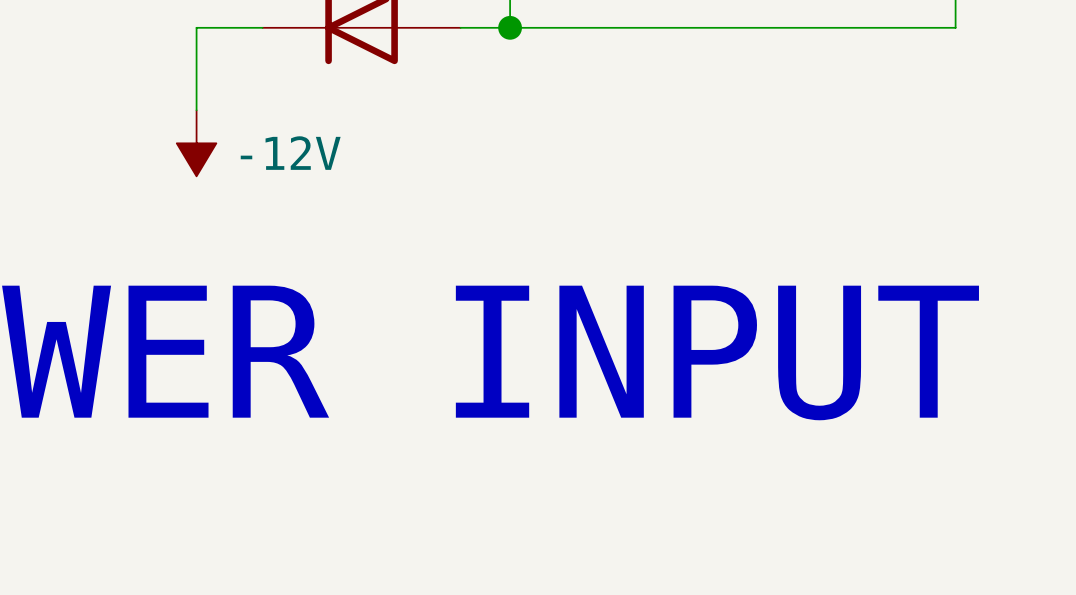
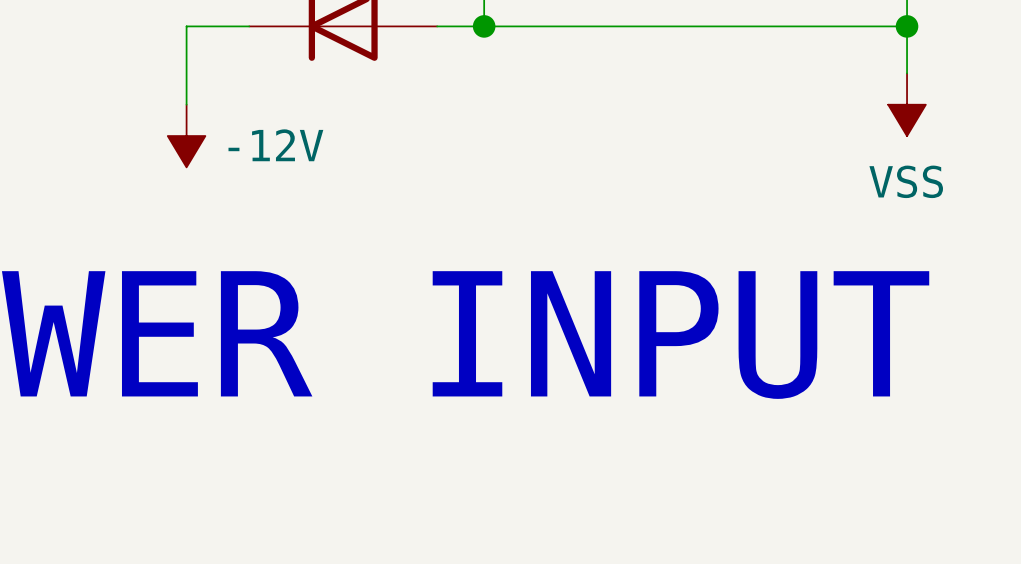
wire: none -> (907, 26) (907, 73)
junction: none -> (907, 26)
power symbol: none -> VSS (907, 104)

